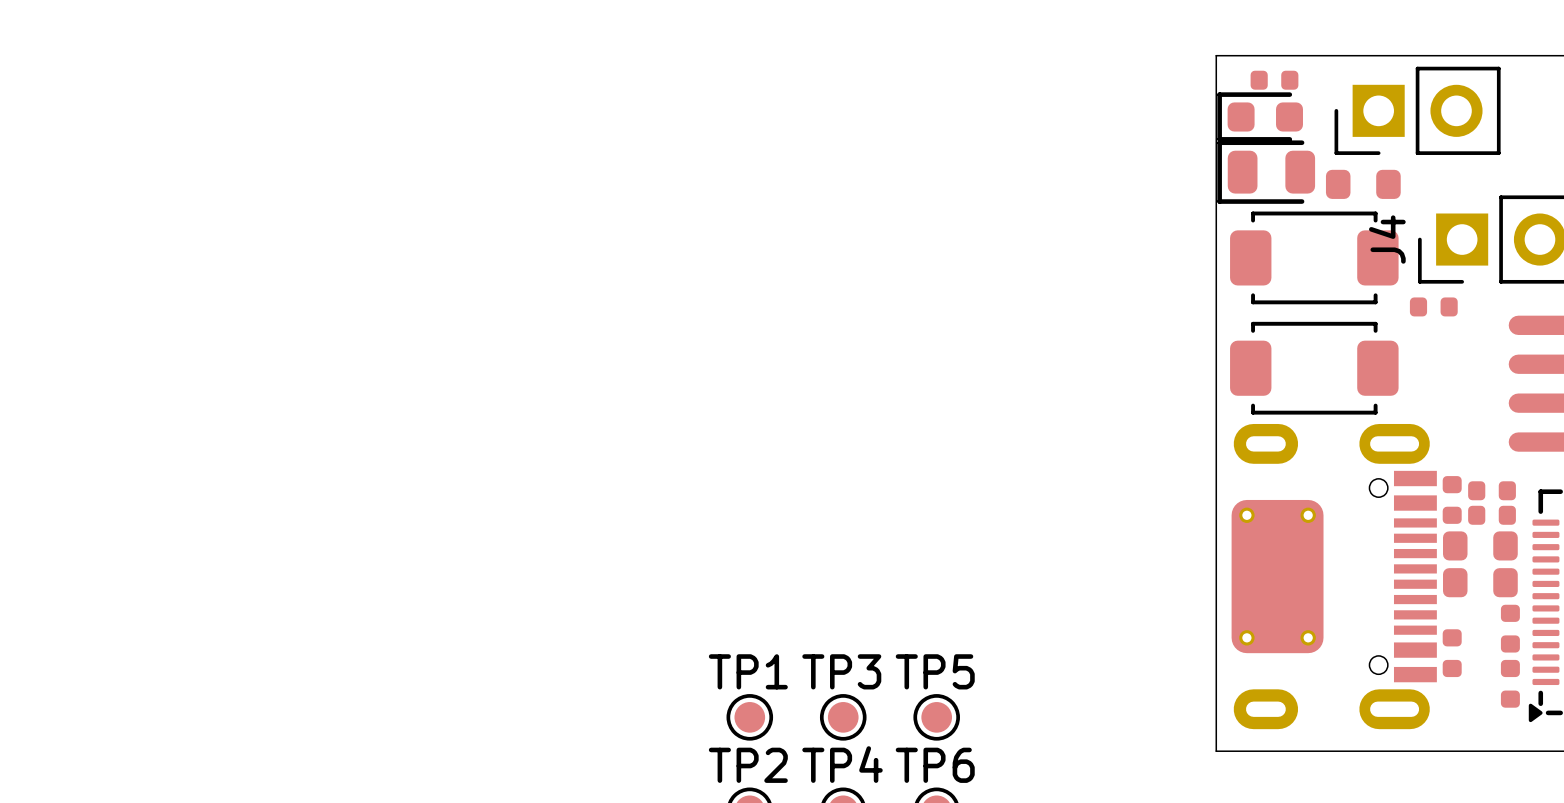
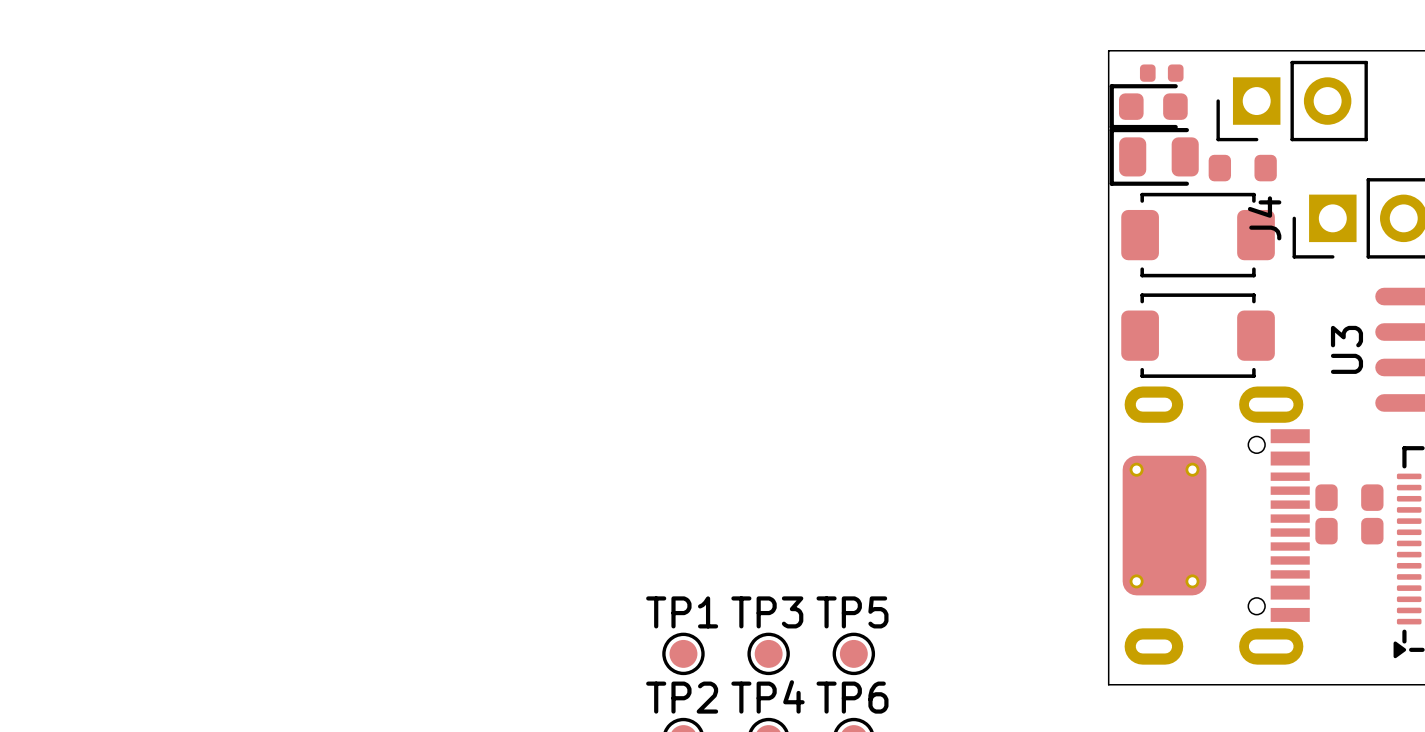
part: (1433, 306) -> none
U3 name: none -> U3 (1346, 349)
part: (1492, 490) -> none
part: (1452, 499) -> none
part: (1492, 515) -> none
part: (1510, 628) -> none
part: (1452, 653) -> none
part: (1510, 683) -> none

